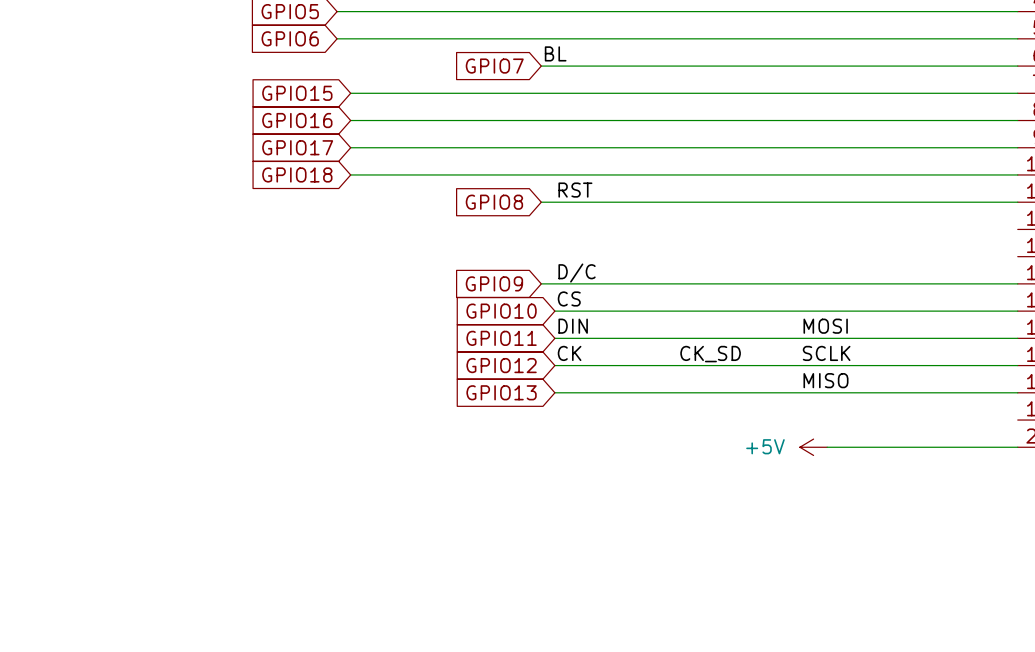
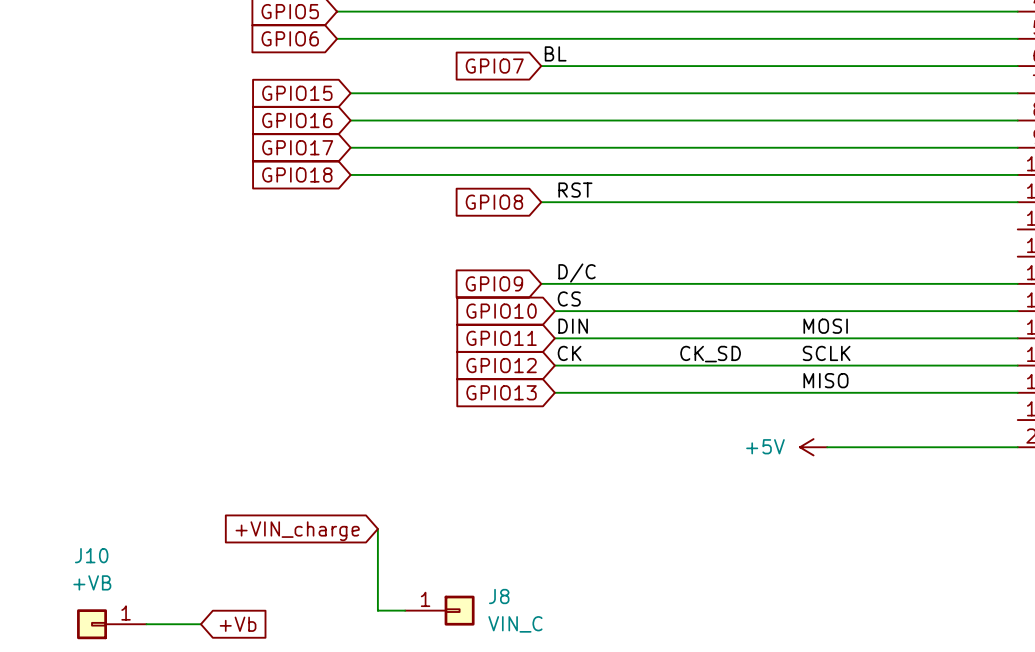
wire: none -> (377, 528) (377, 610) (405, 610)
global label: none -> +VIN_charge (297, 531)
J8: none -> VIN_C (439, 610)
J10: none -> +VB (111, 624)
wire: none -> (146, 624) (200, 624)
global label: none -> +Vb (238, 624)

